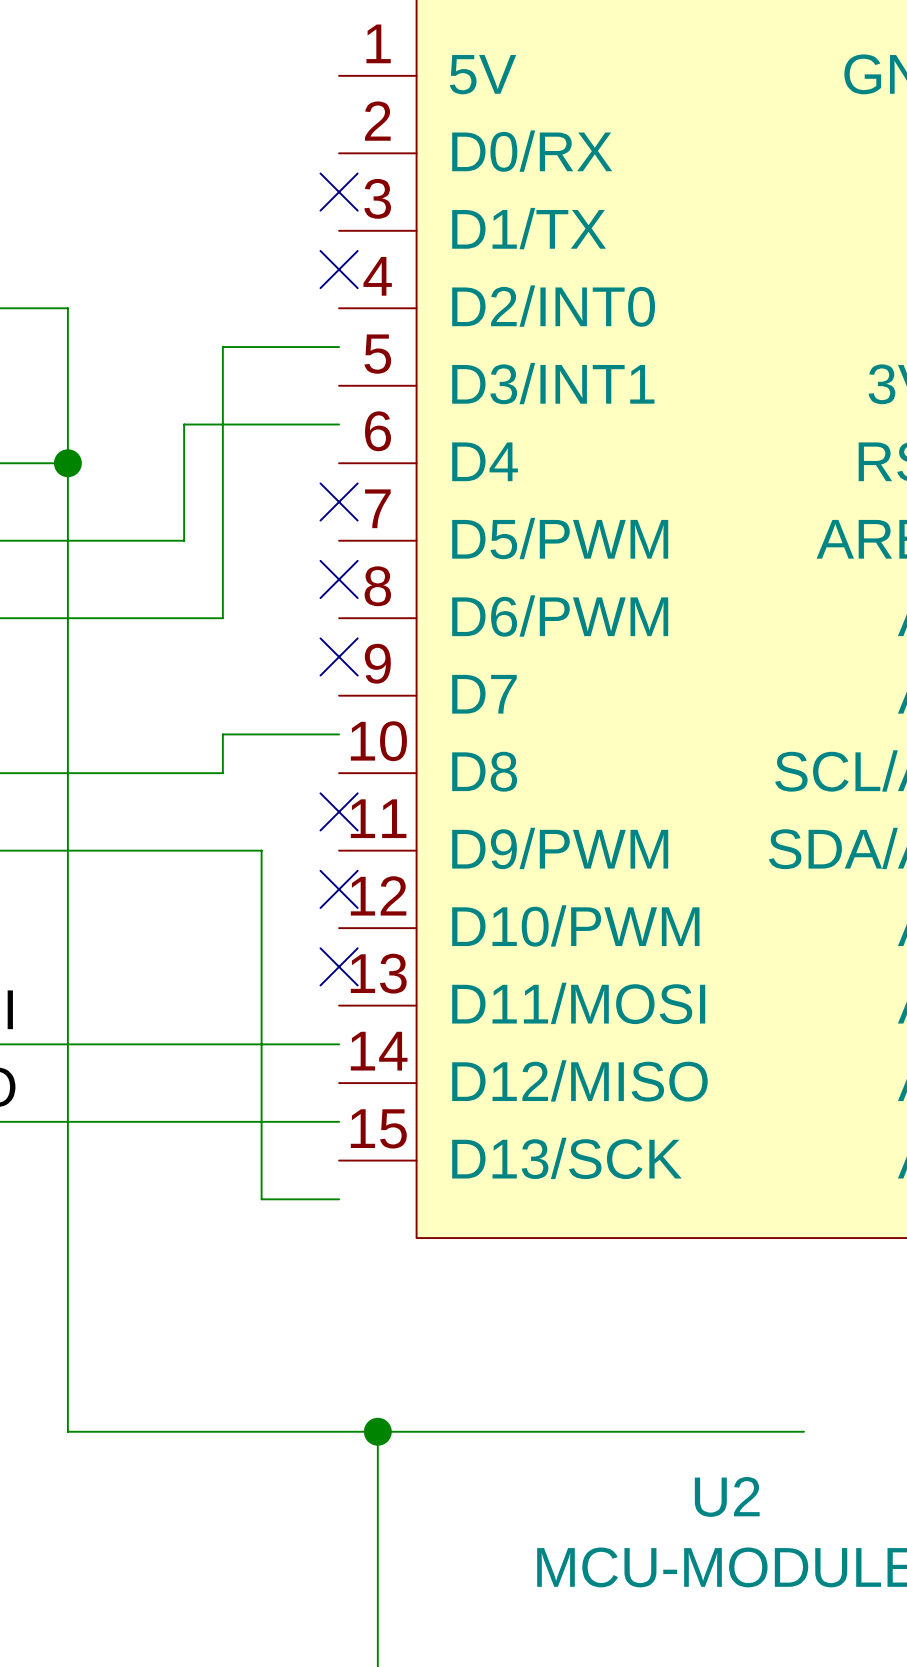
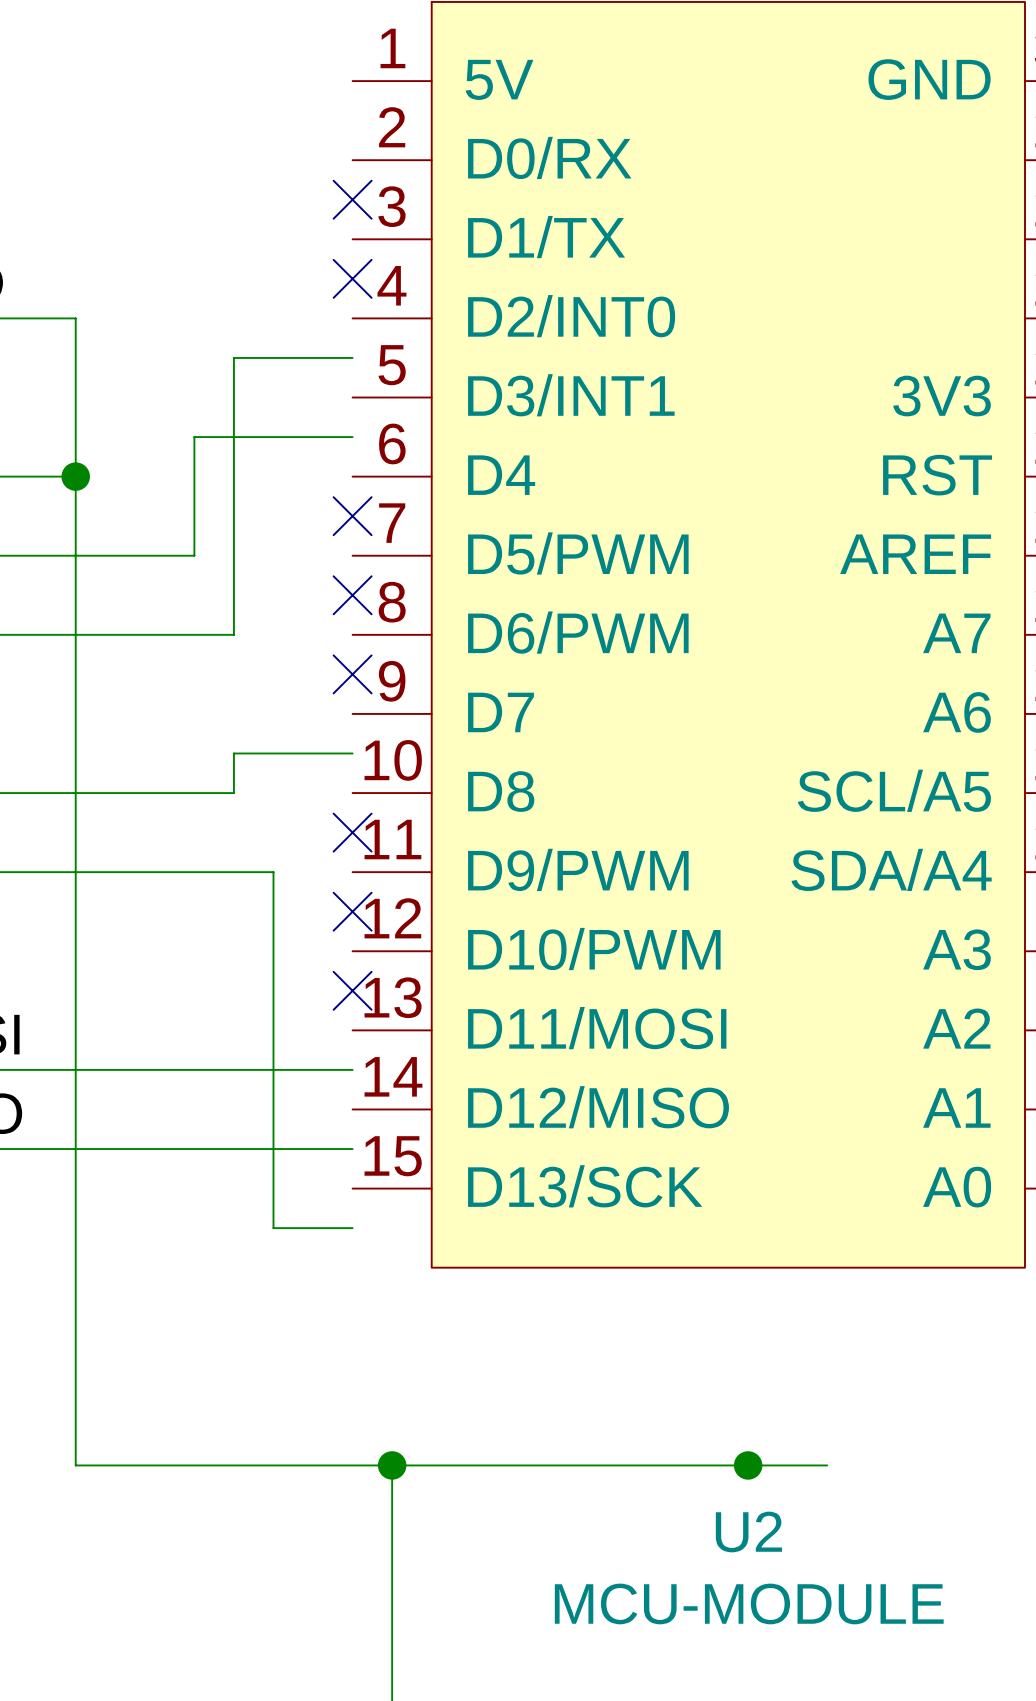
junction: none -> (748, 1465)

